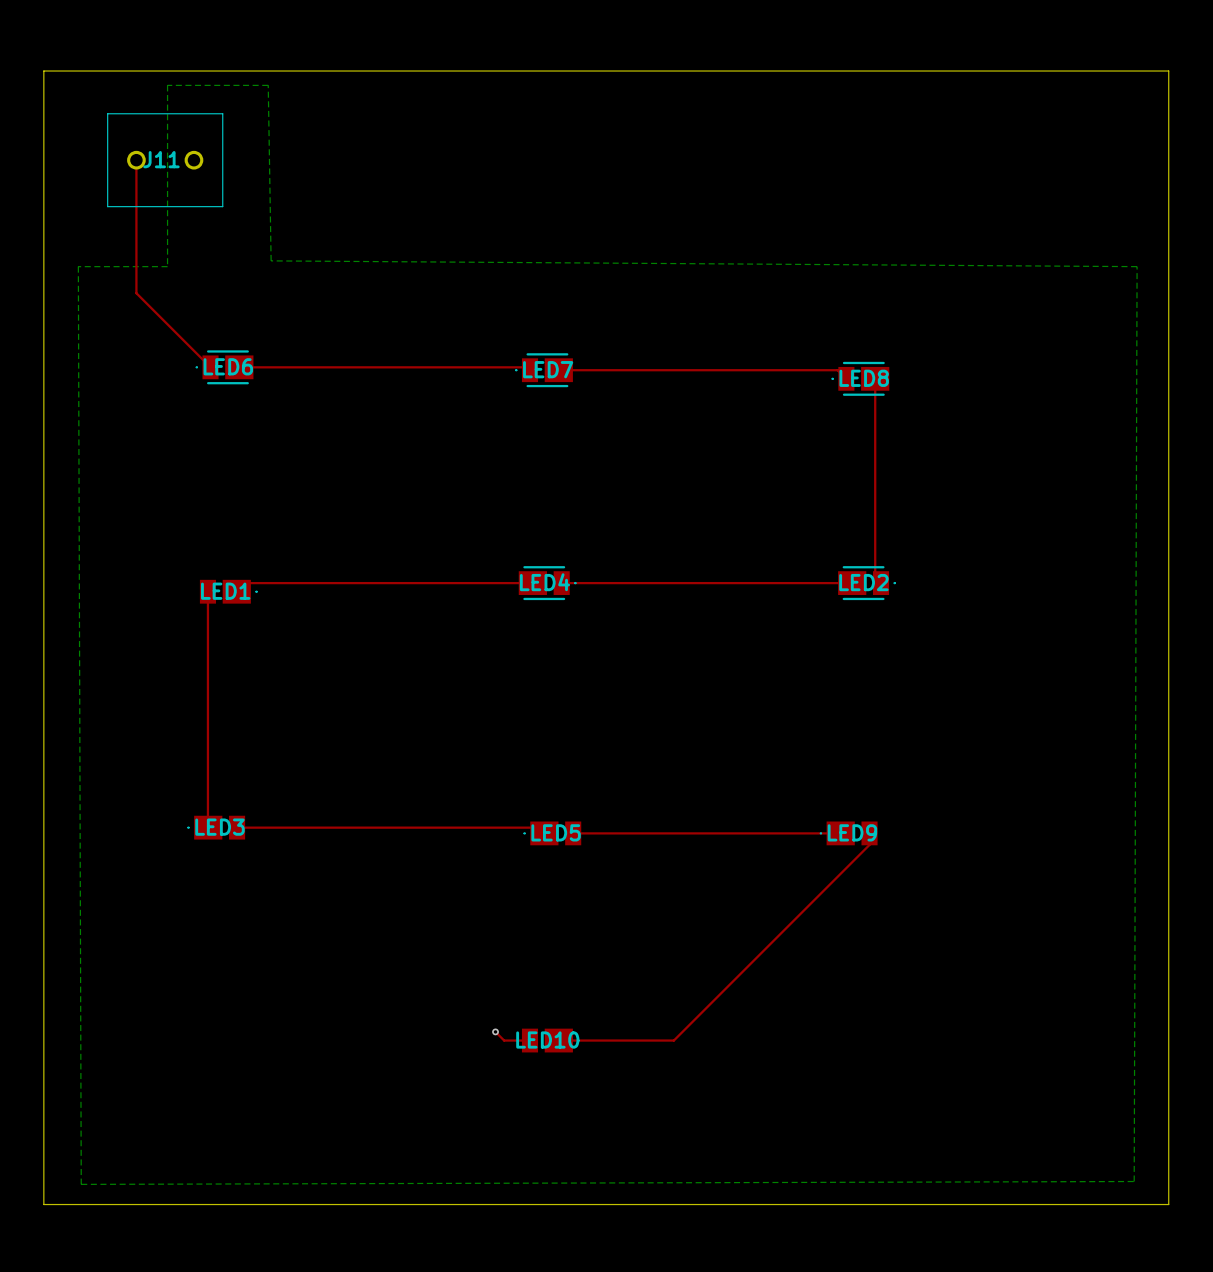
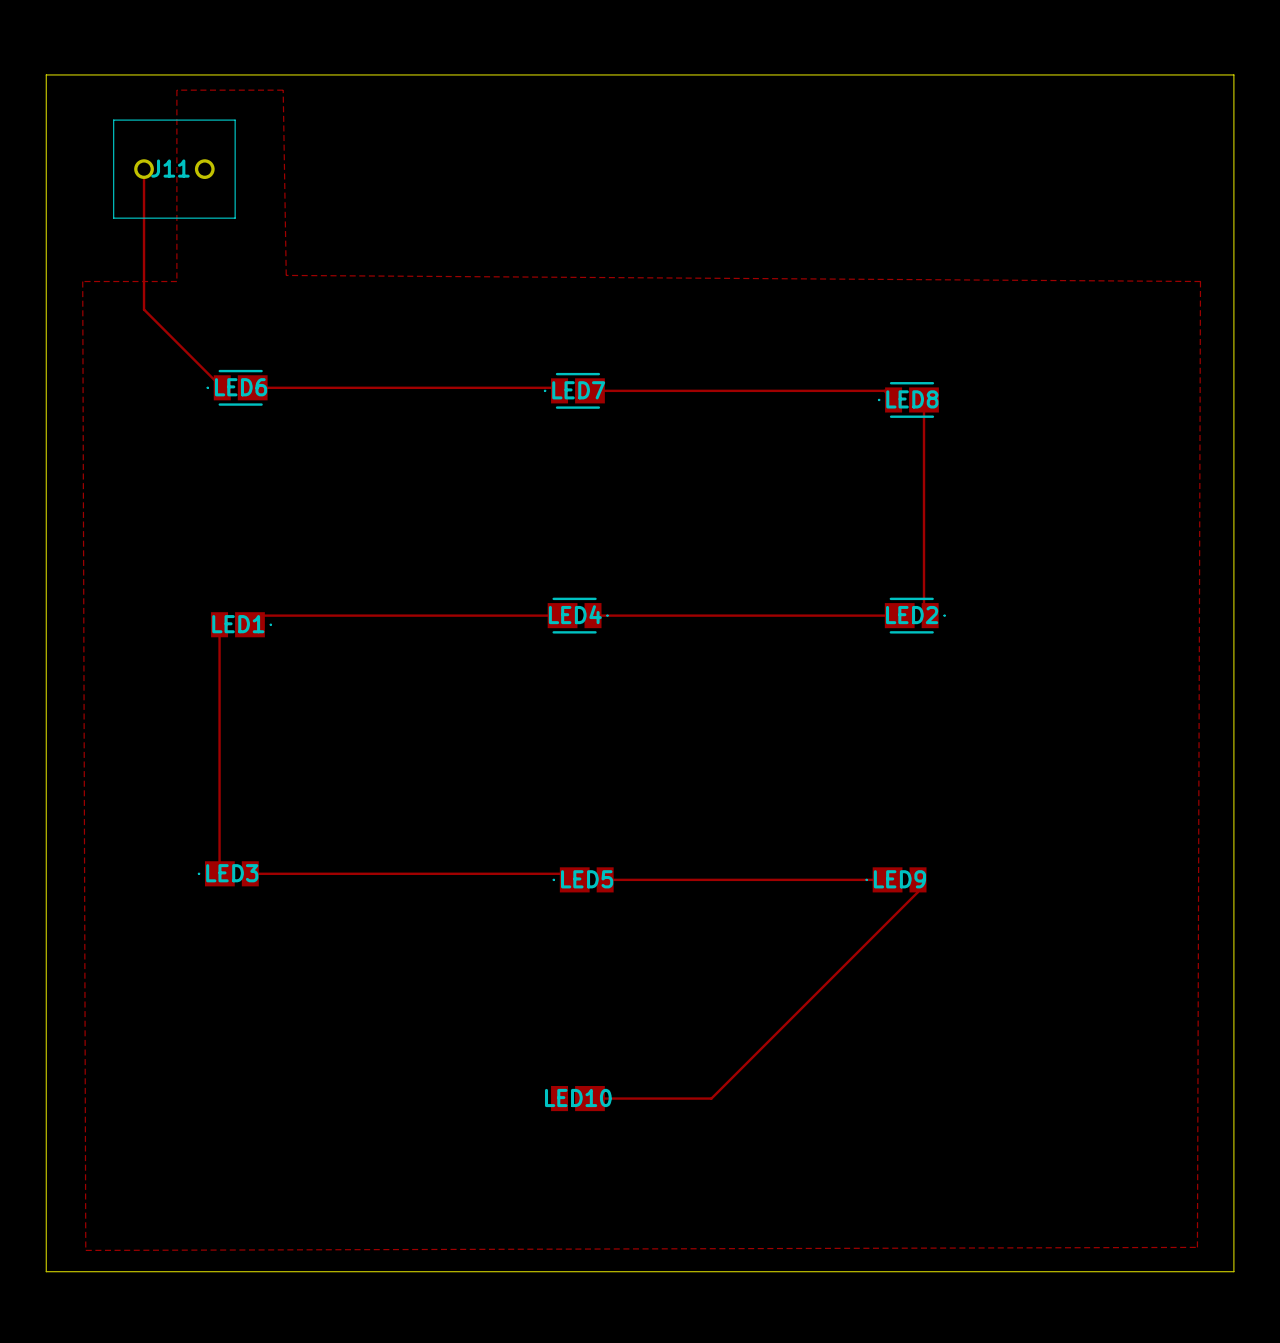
bottom zone outline: (167, 85) (268, 85) (271, 260) (1137, 266) (1134, 1181) (81, 1184) (78, 266) (167, 266) (167, 85) -> none
top zone outline: none -> (176, 90) (283, 90) (286, 275) (1200, 281) (1197, 1247) (85, 1250) (82, 281) (176, 281) (176, 90)
top track: (495, 1031) (504, 1040) (529, 1040) -> none
via: (495, 1031) -> none

